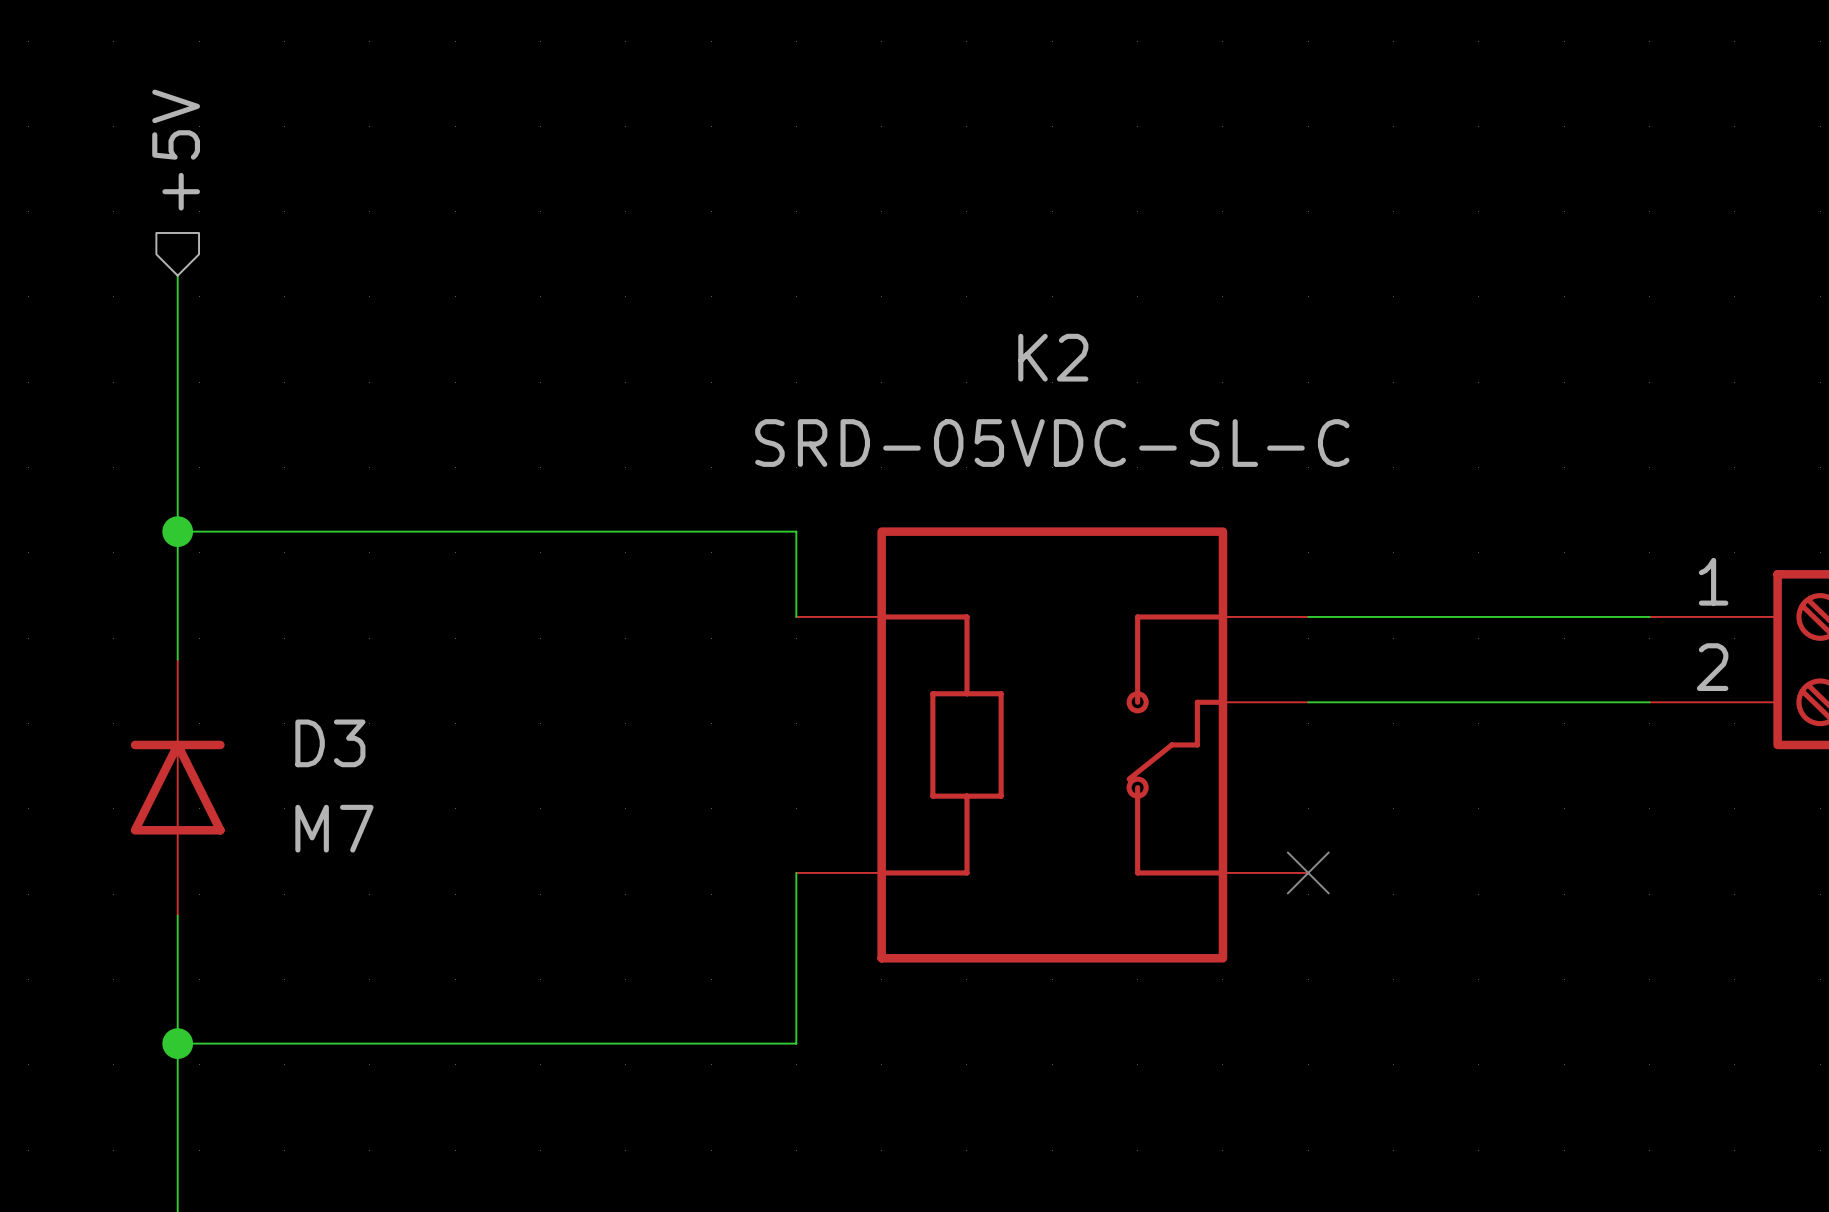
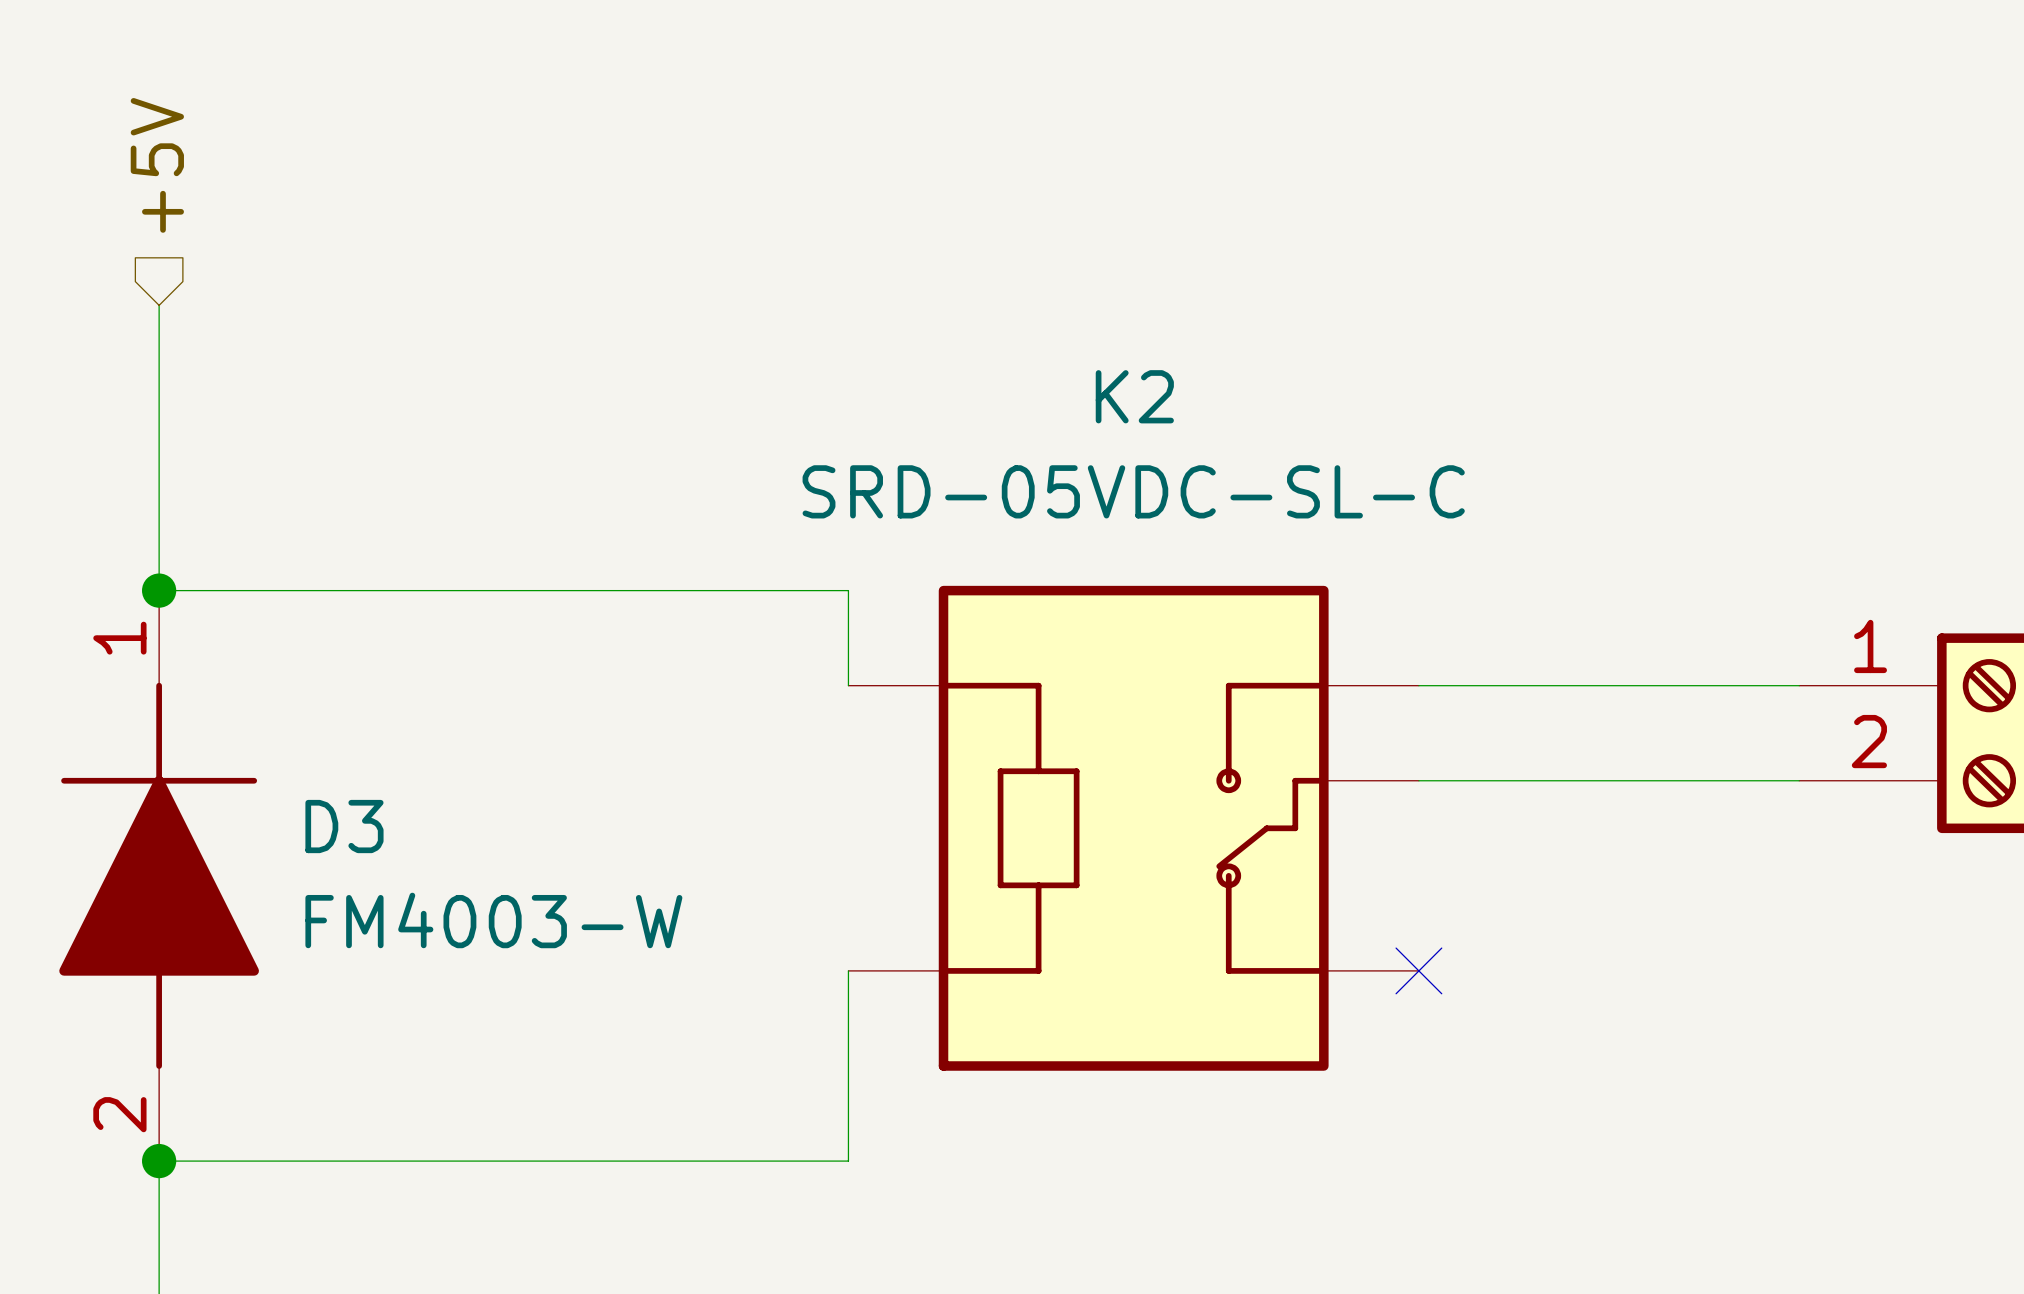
D3 symbol: [130, 659, 225, 916] -> [59, 590, 259, 1162]
D3 value: M7 (334, 828) -> FM4003-W (493, 920)

